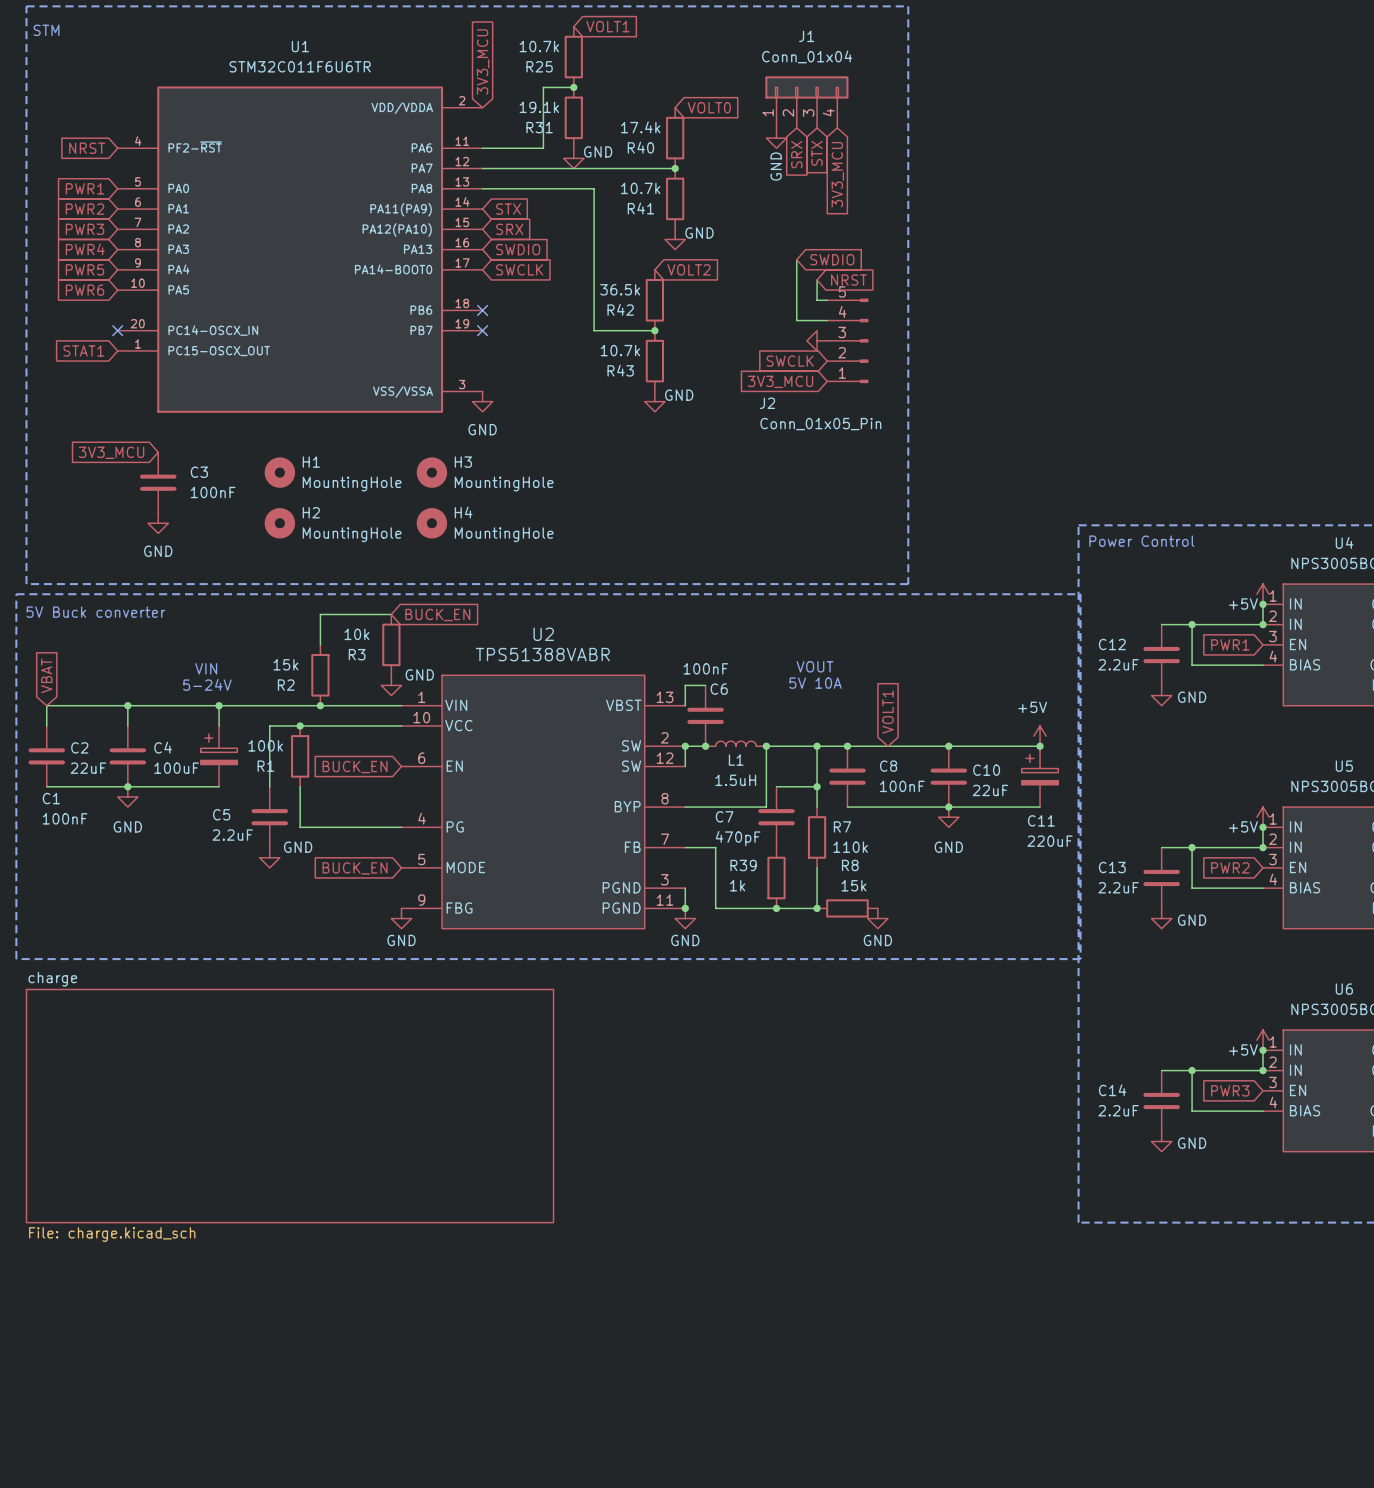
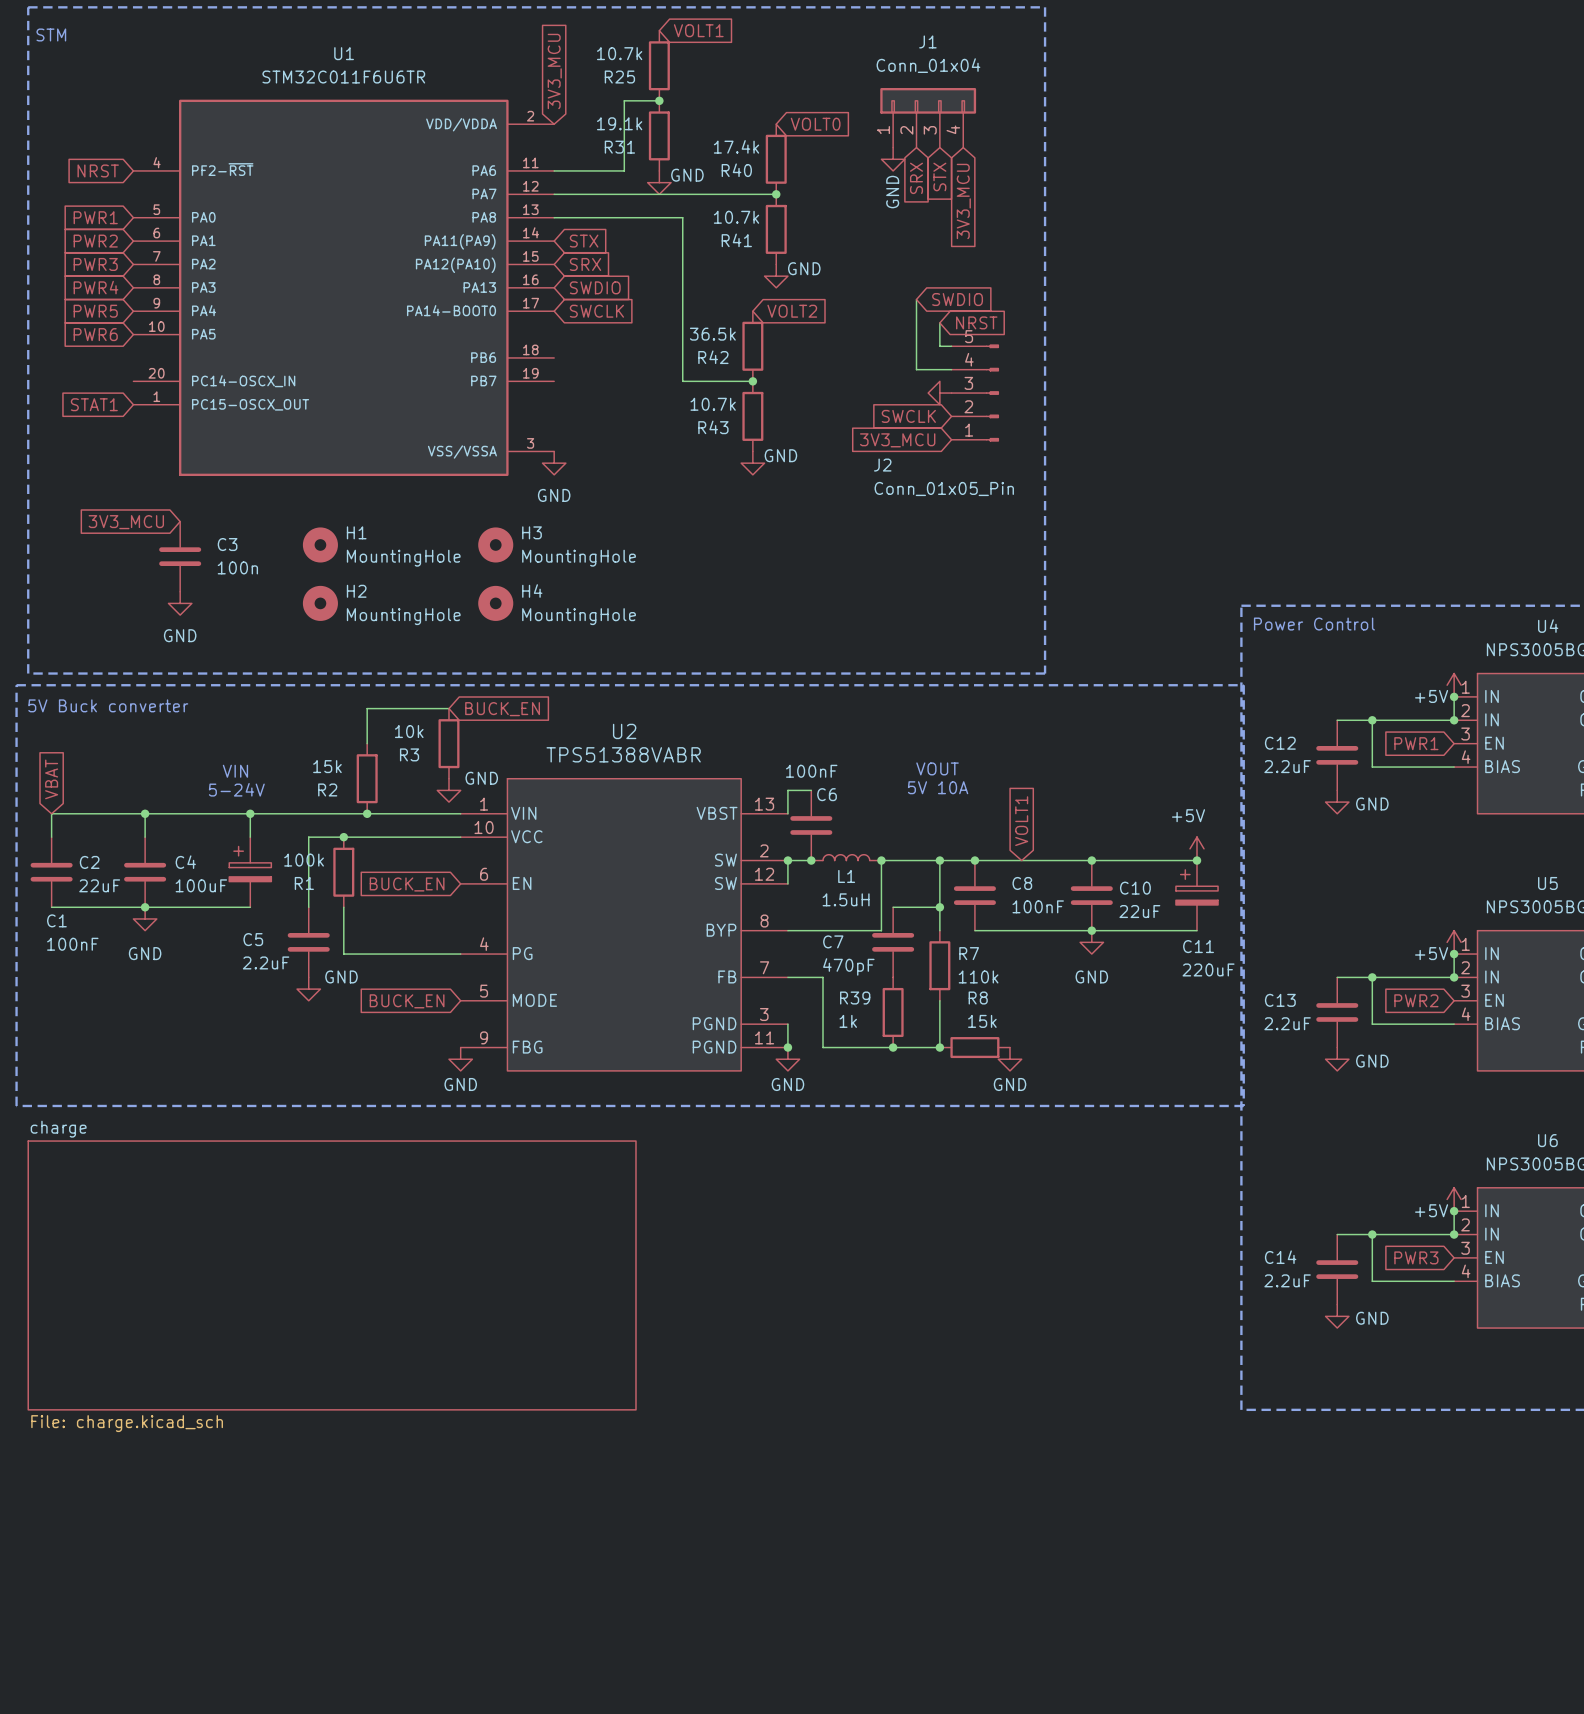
no-connect mark: (482, 310) -> none
no-connect mark: (117, 330) -> none
no-connect mark: (482, 330) -> none
C3 value: 100nF (213, 492) -> 100n (237, 567)

